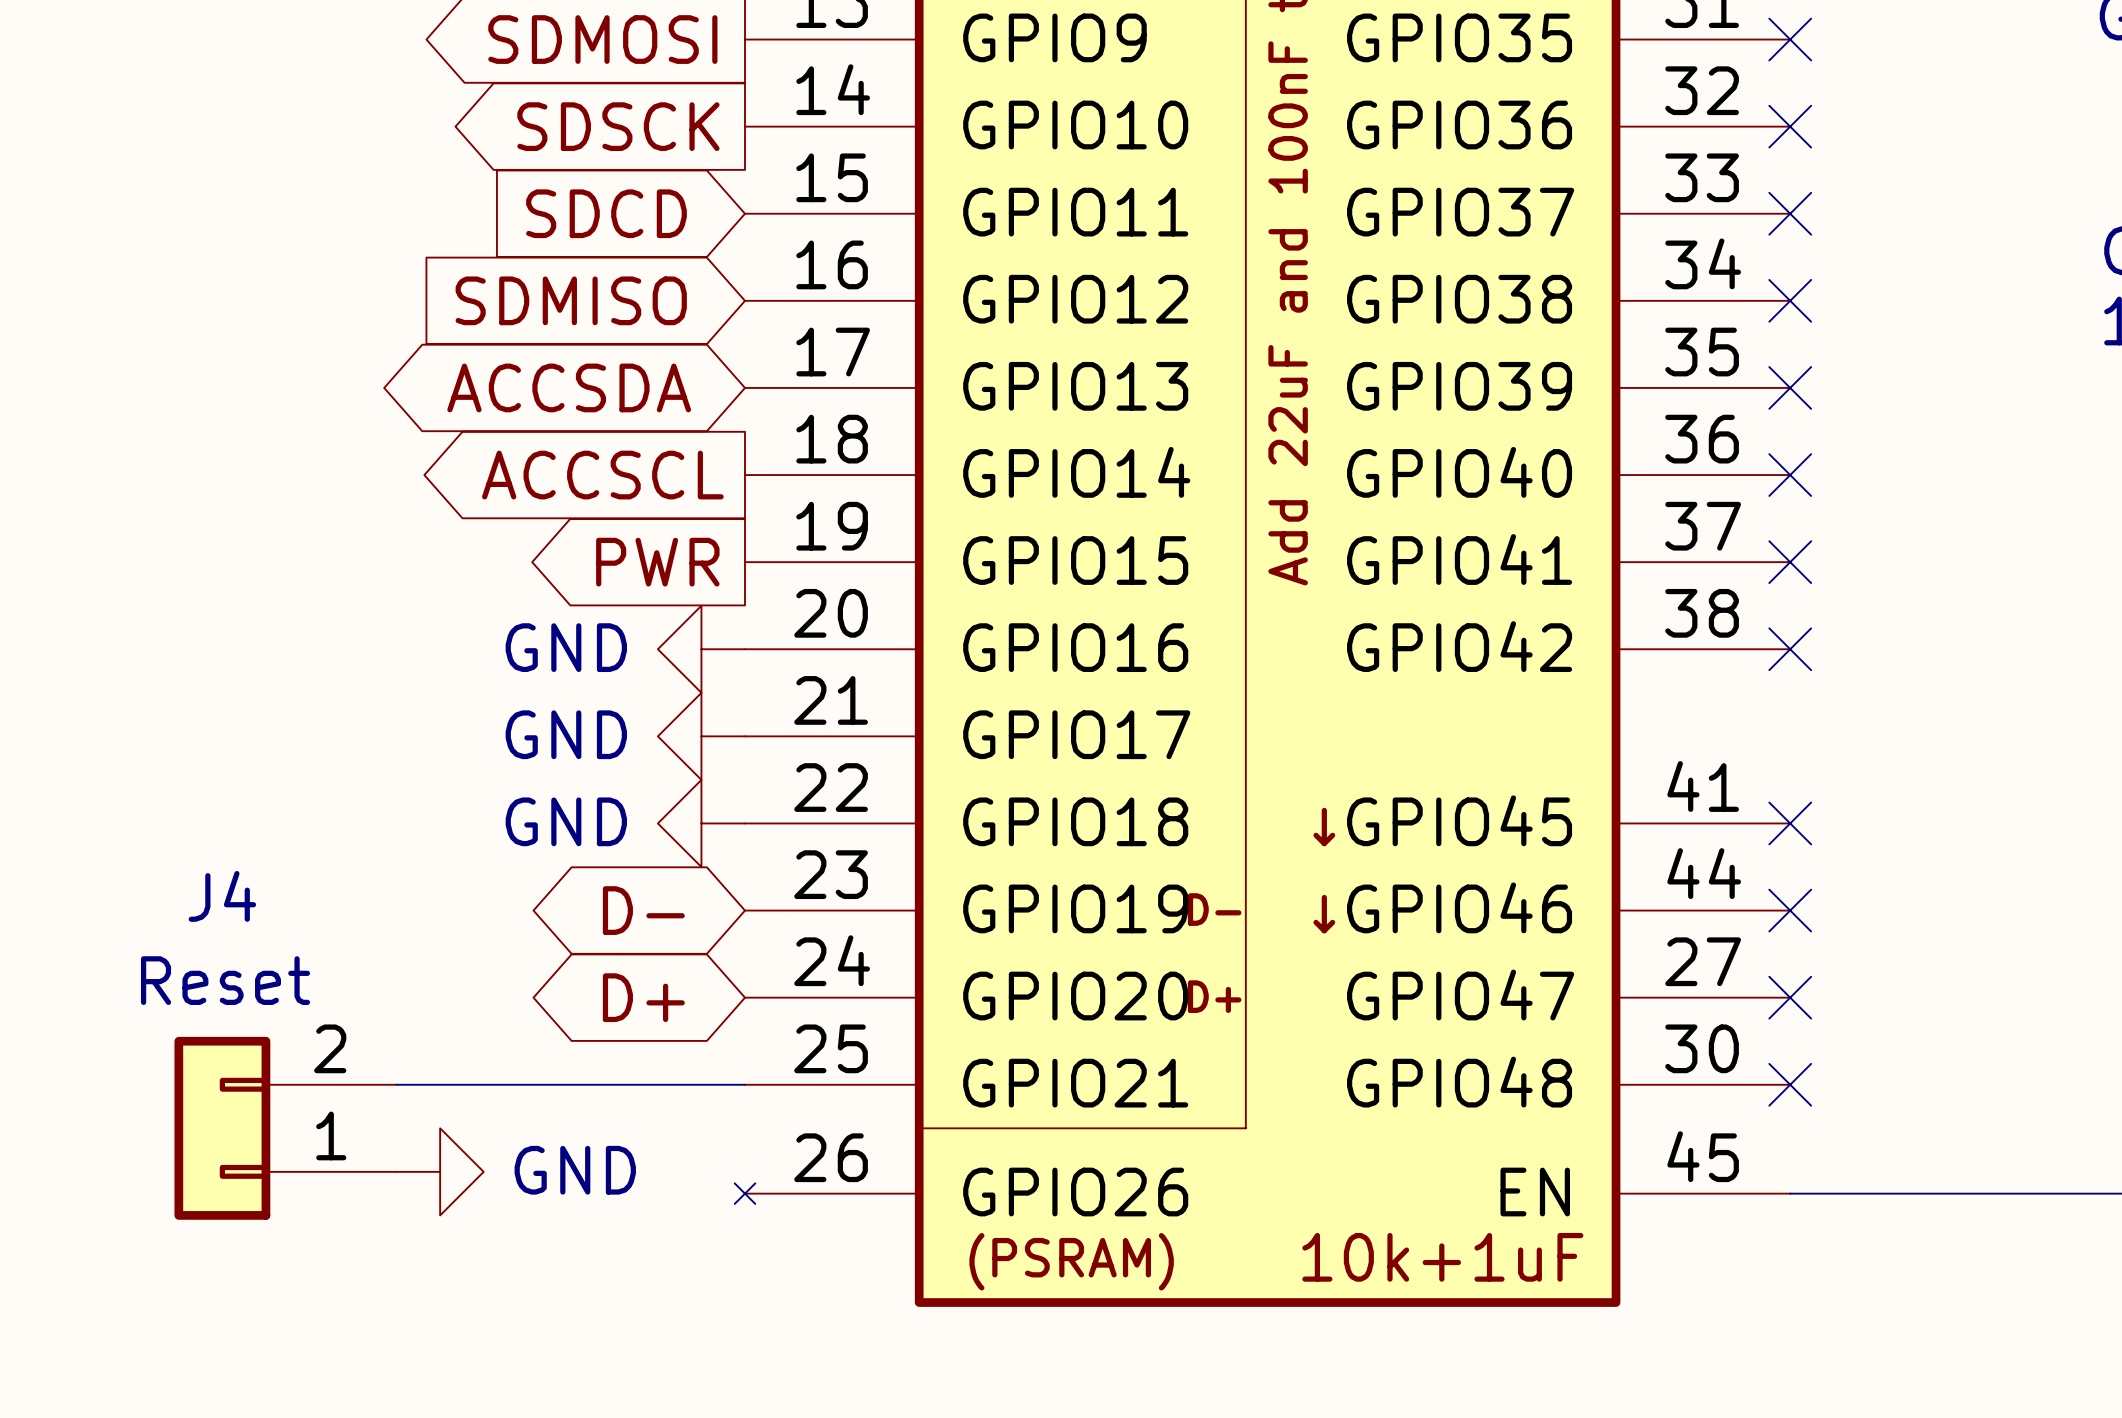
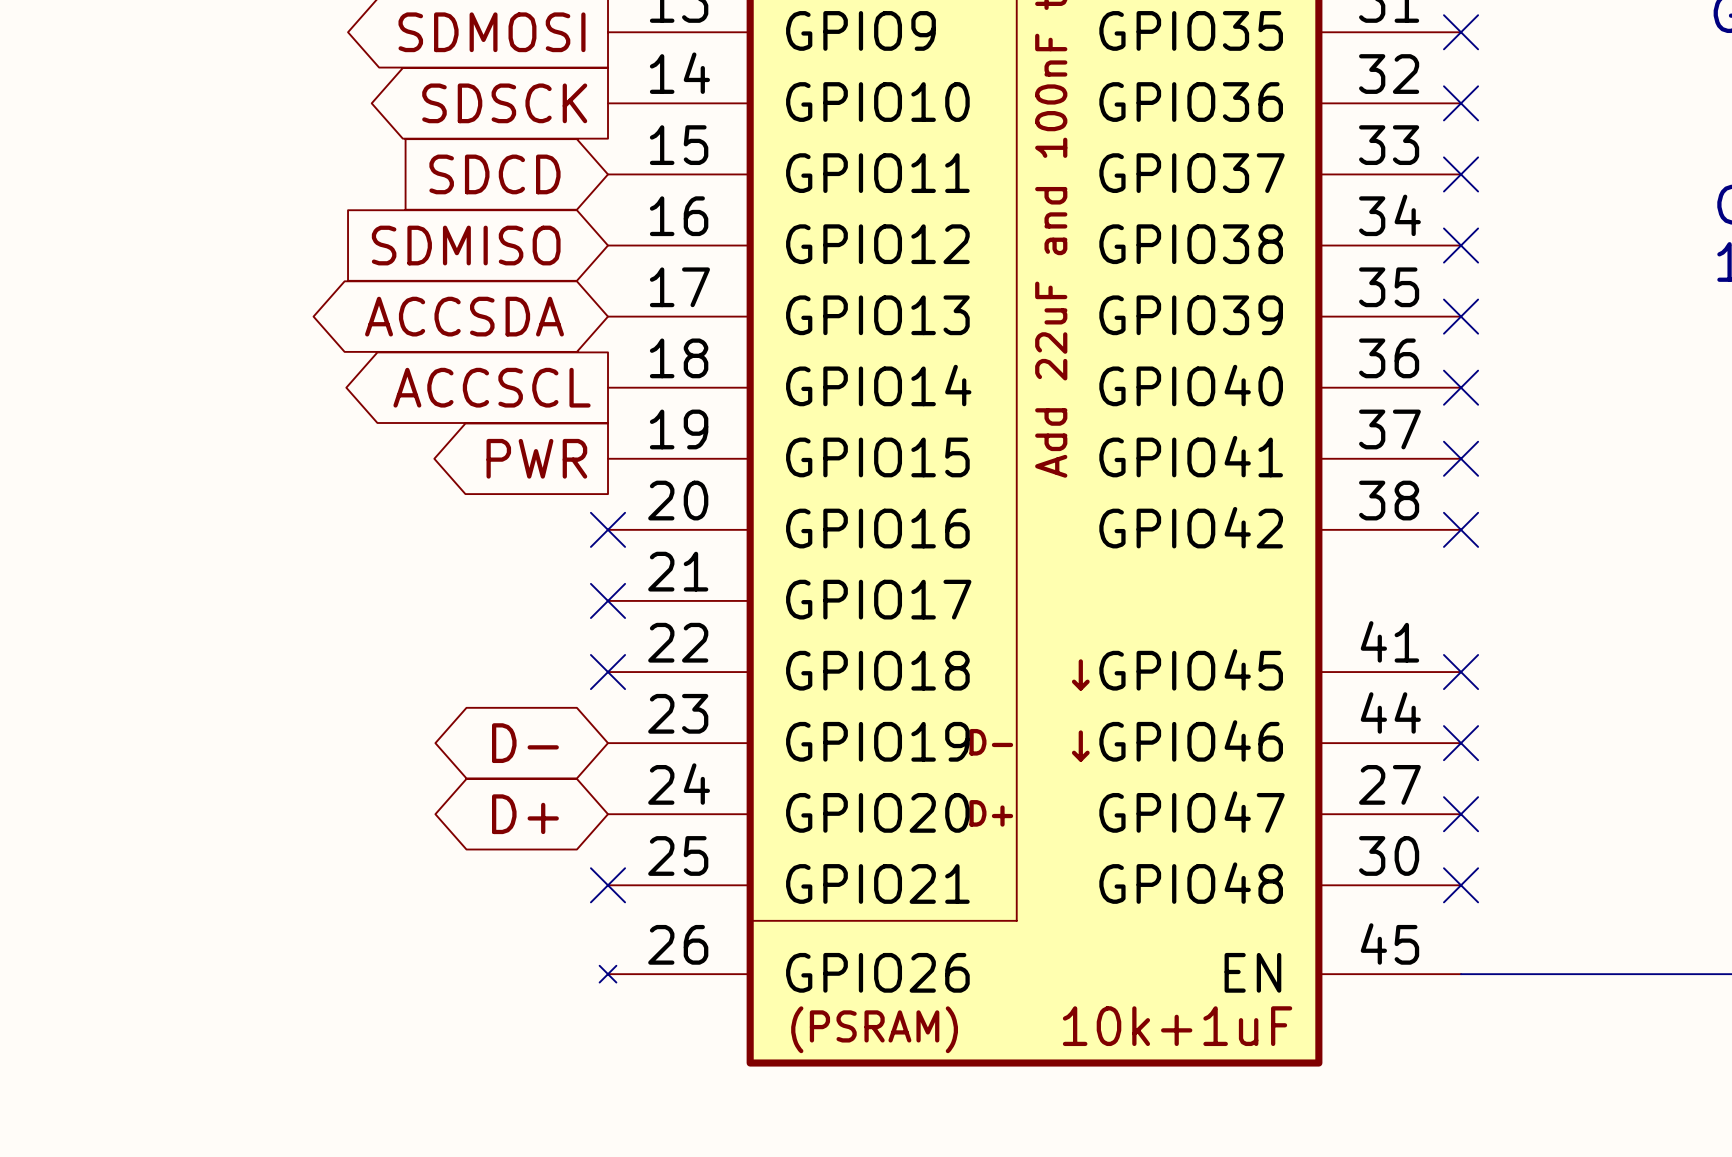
power symbol: GND (701, 649) -> none
no-connect mark: none -> (608, 529)
power symbol: GND (701, 736) -> none
no-connect mark: none -> (608, 600)
power symbol: GND (701, 823) -> none
no-connect mark: none -> (608, 672)
wire: (396, 1084) (745, 1084) -> none
no-connect mark: none -> (608, 885)
J4: Reset (285, 1128) -> none
power symbol: GND (440, 1171) -> none

